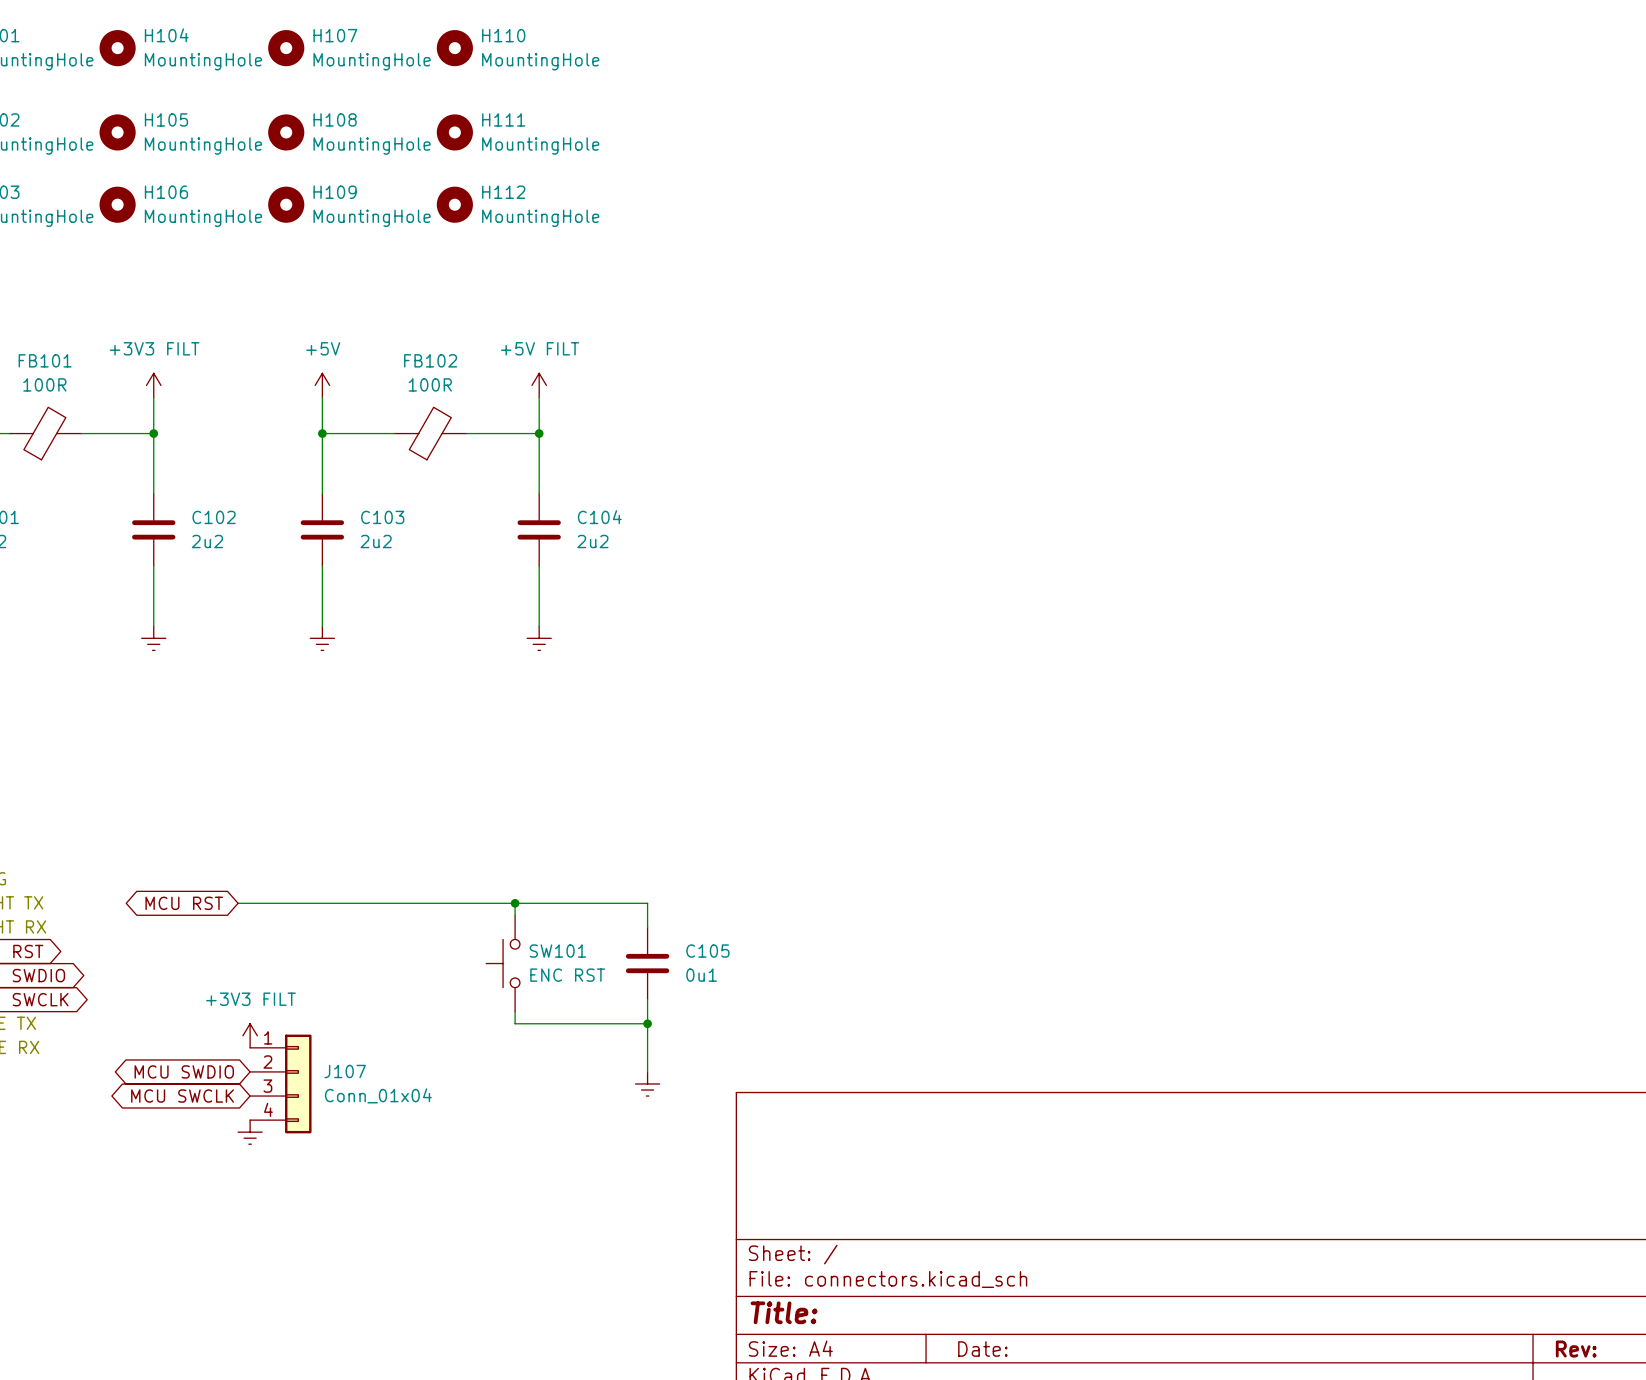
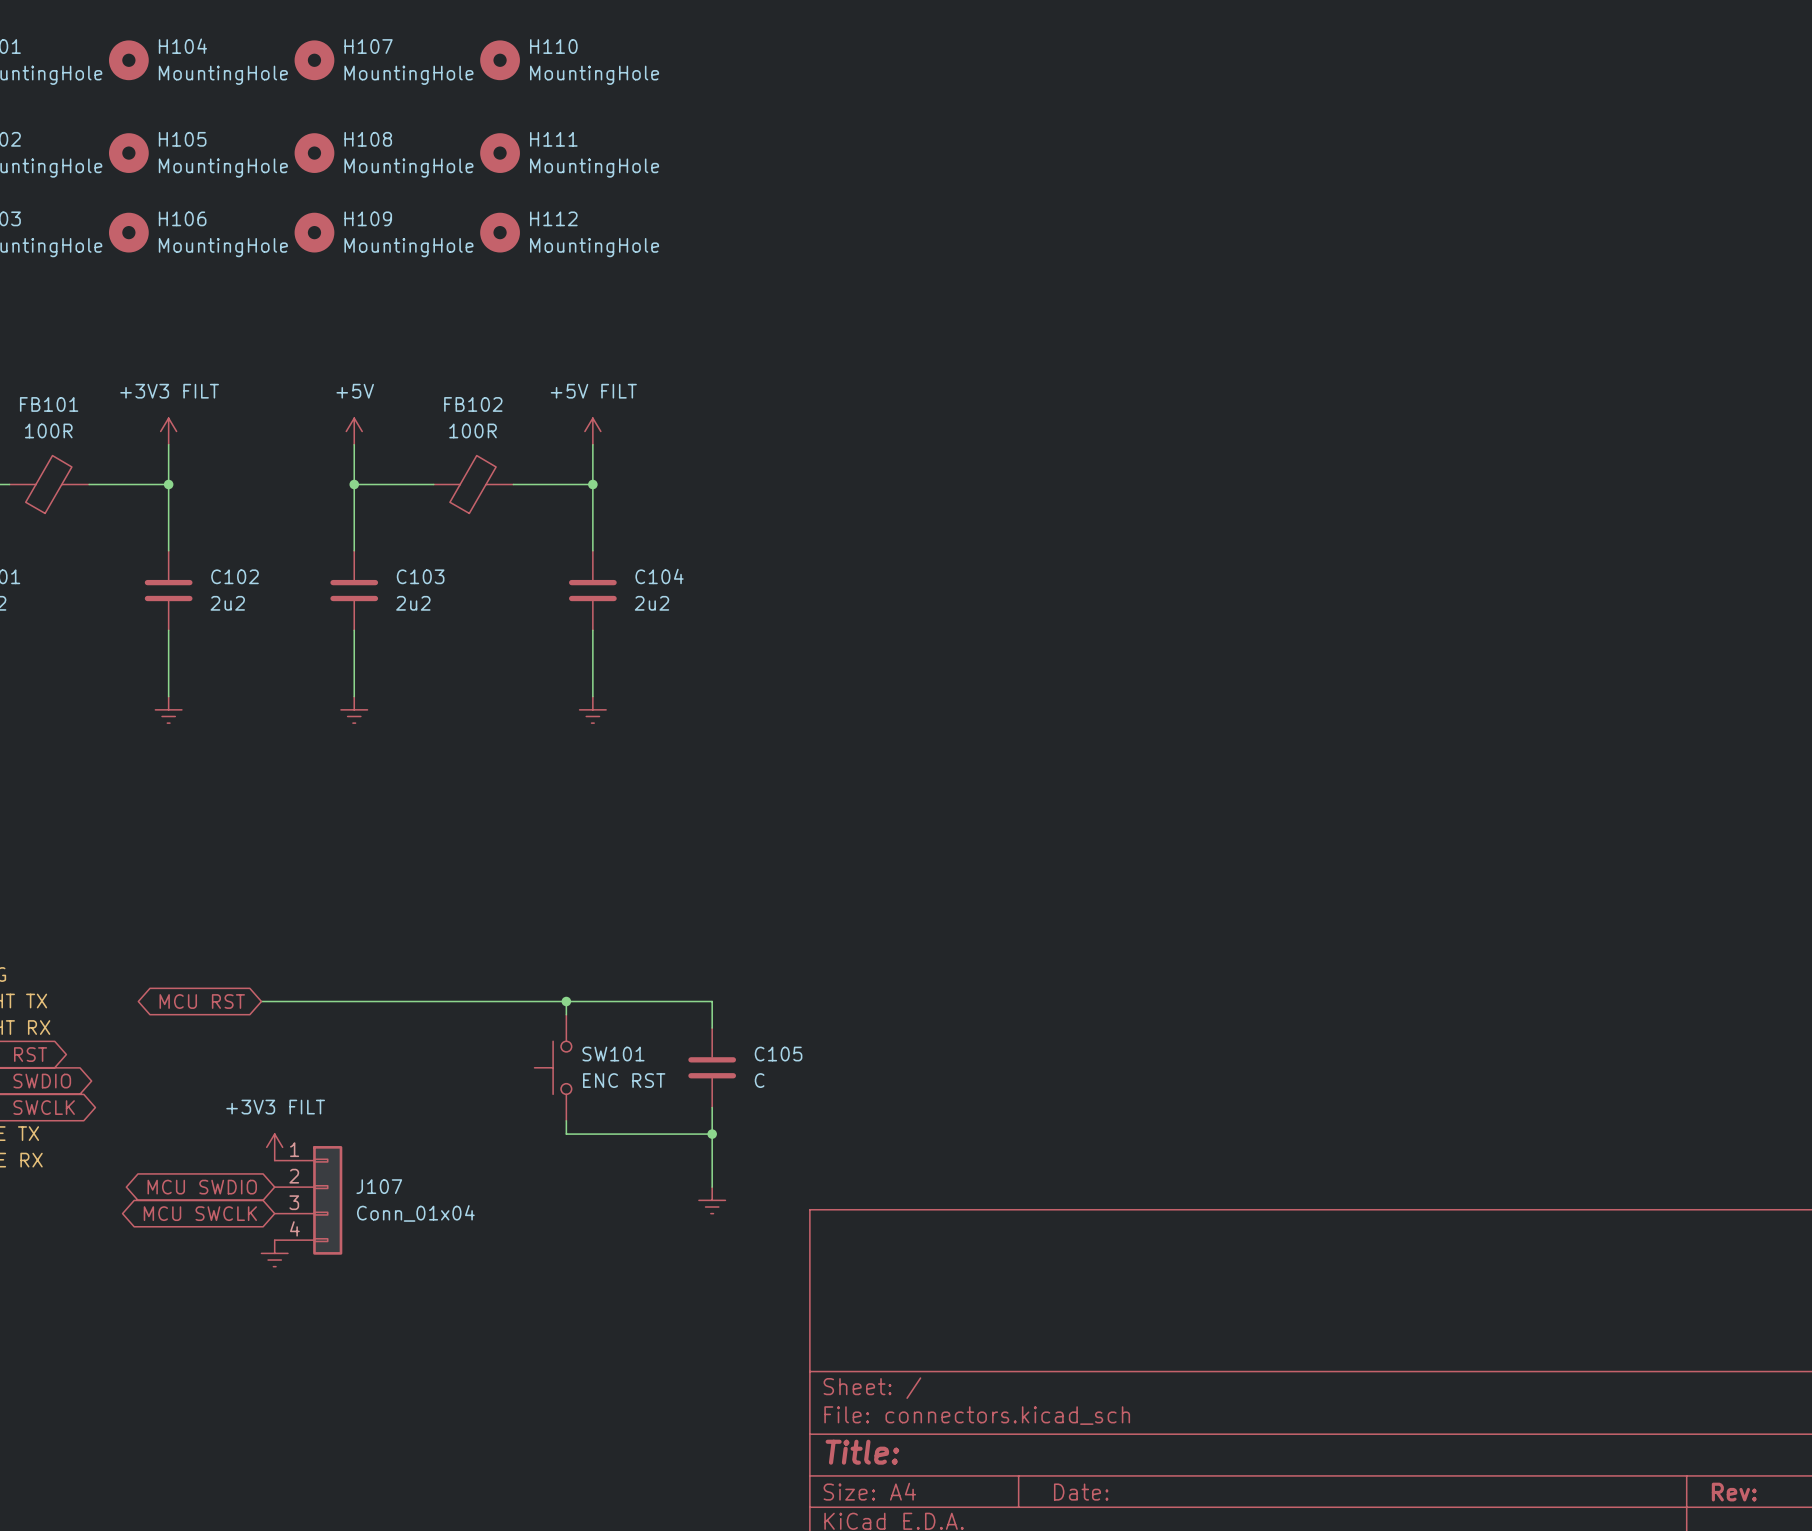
C105 value: 0u1 (701, 975) -> C (759, 1080)

